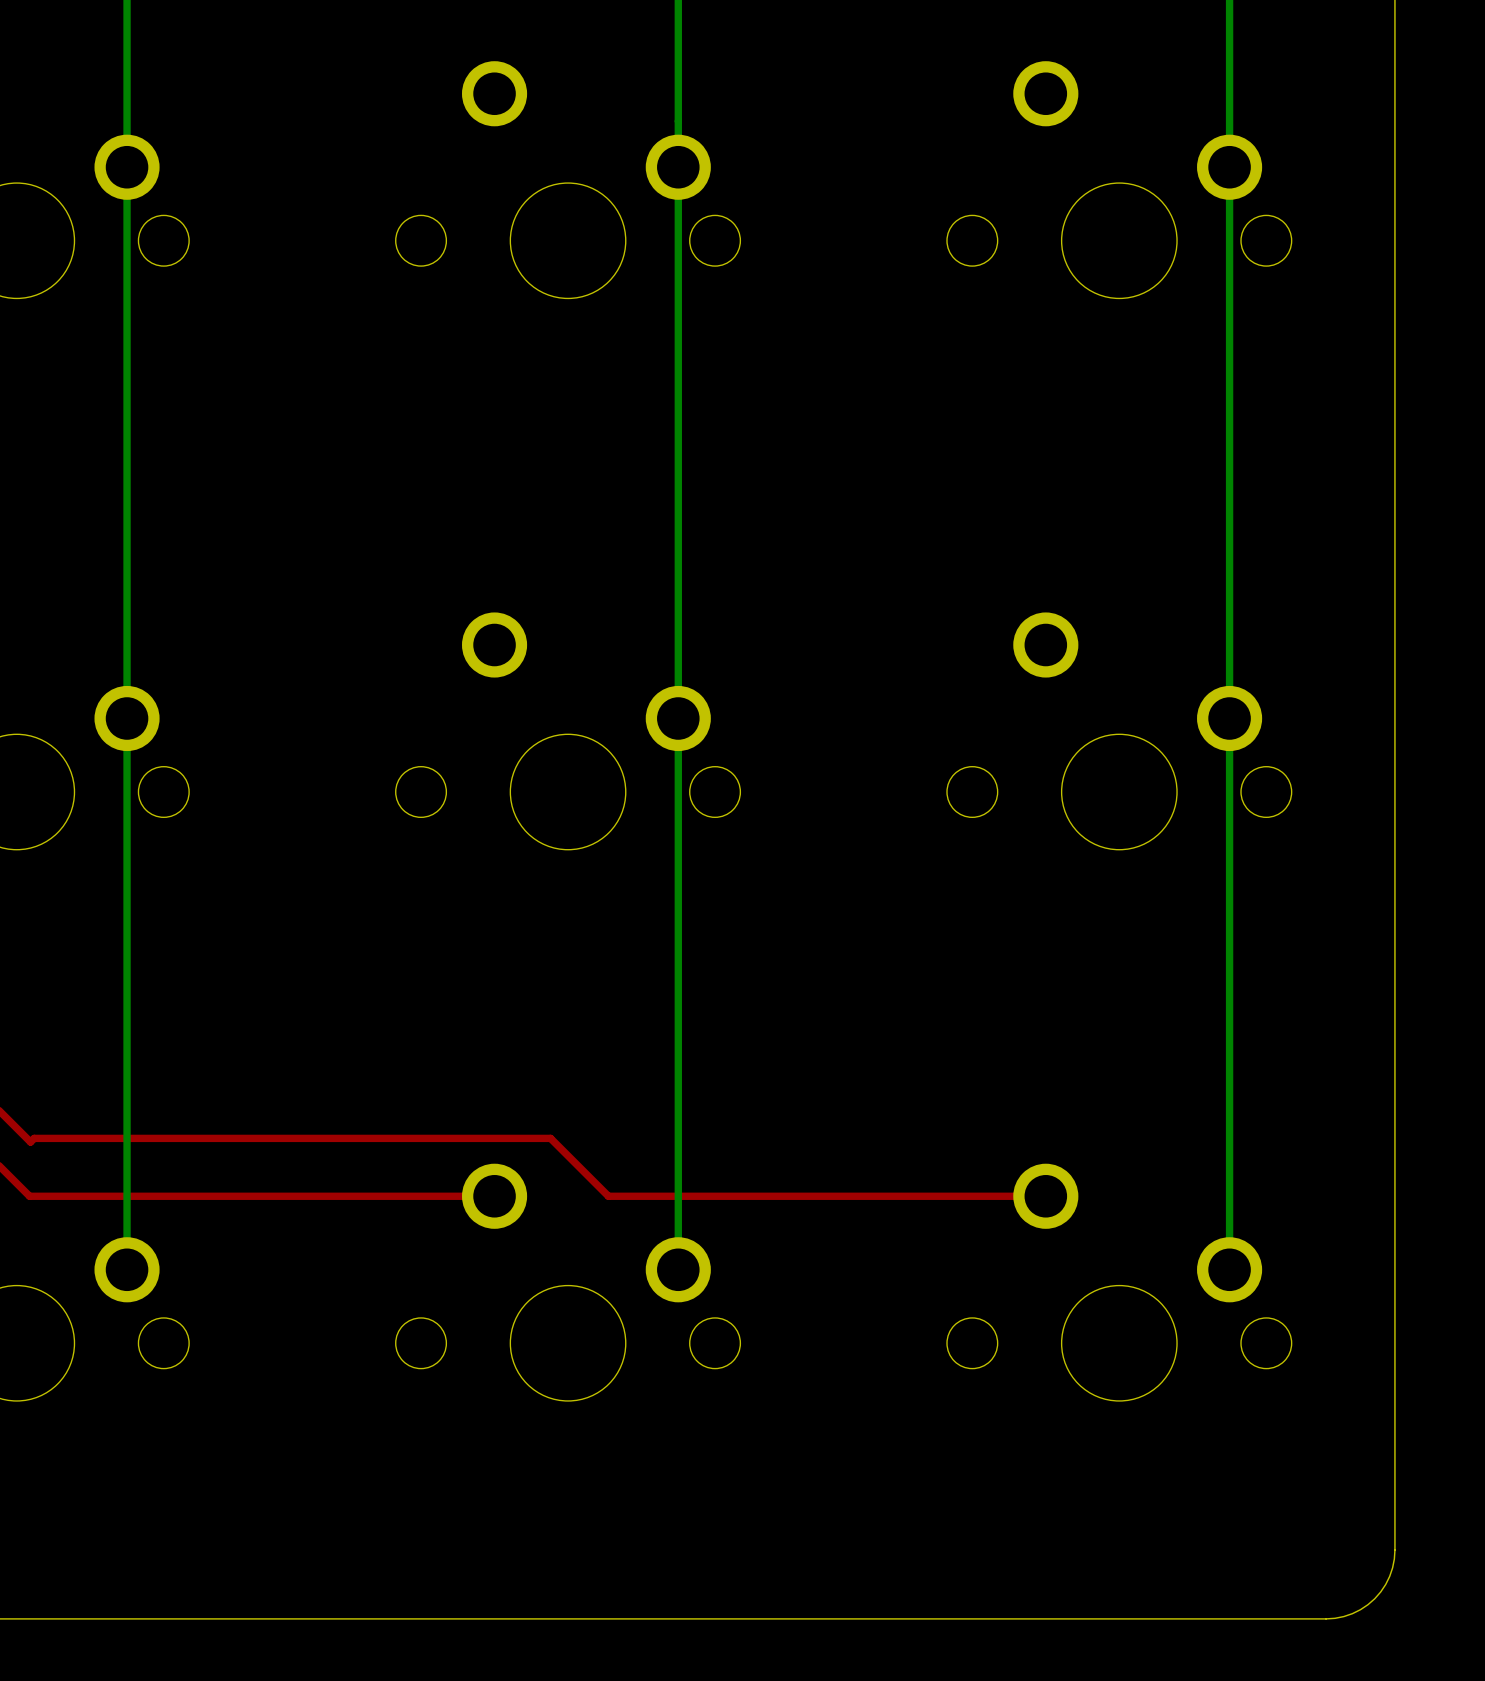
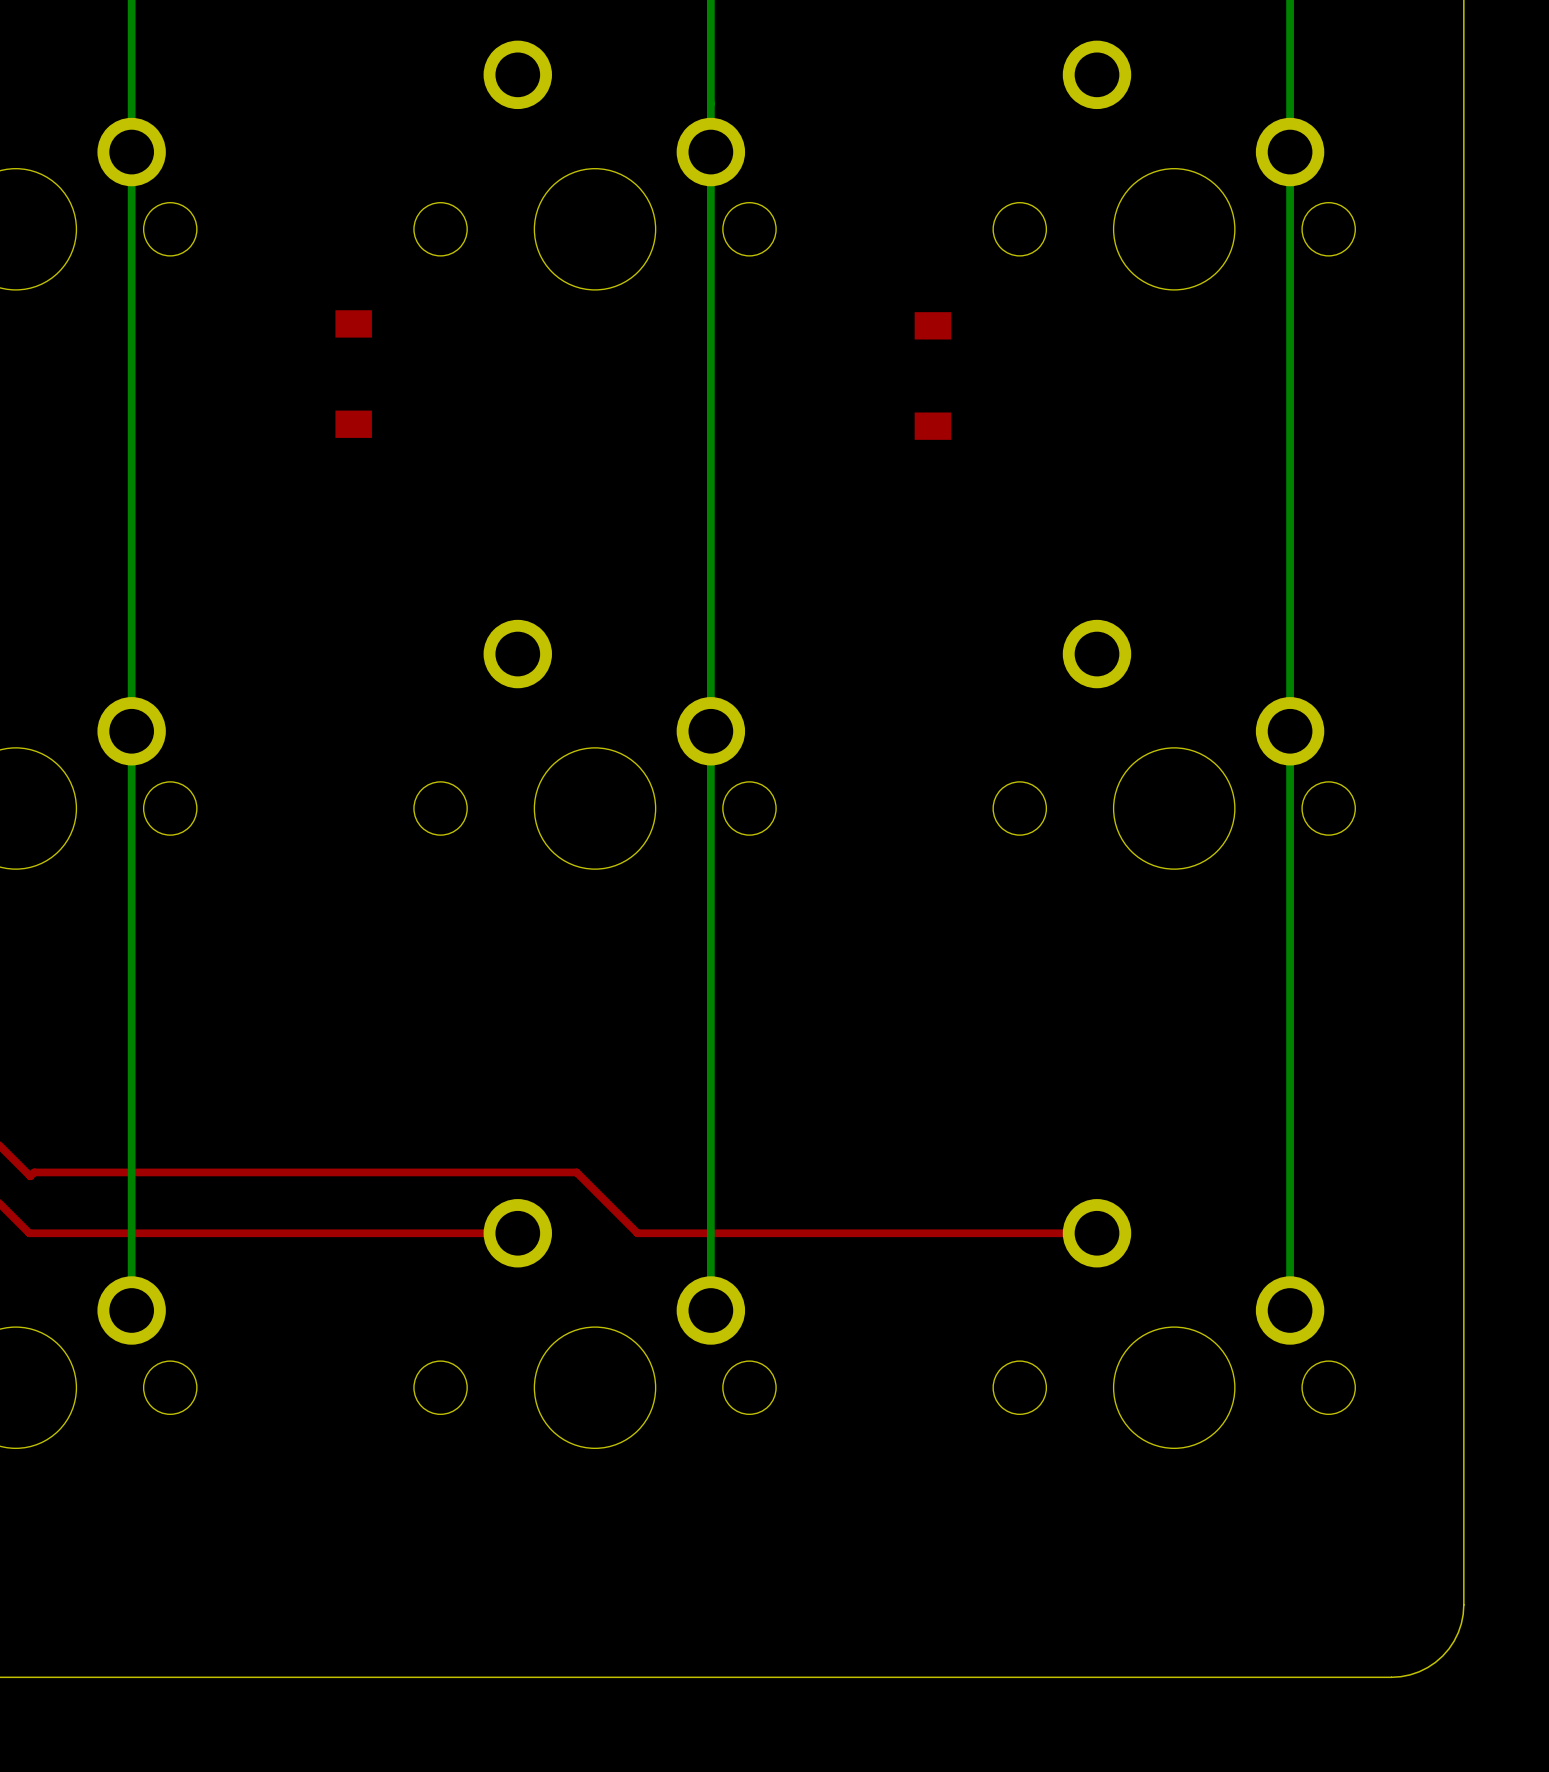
part: none -> (353, 374)
part: none -> (932, 375)

